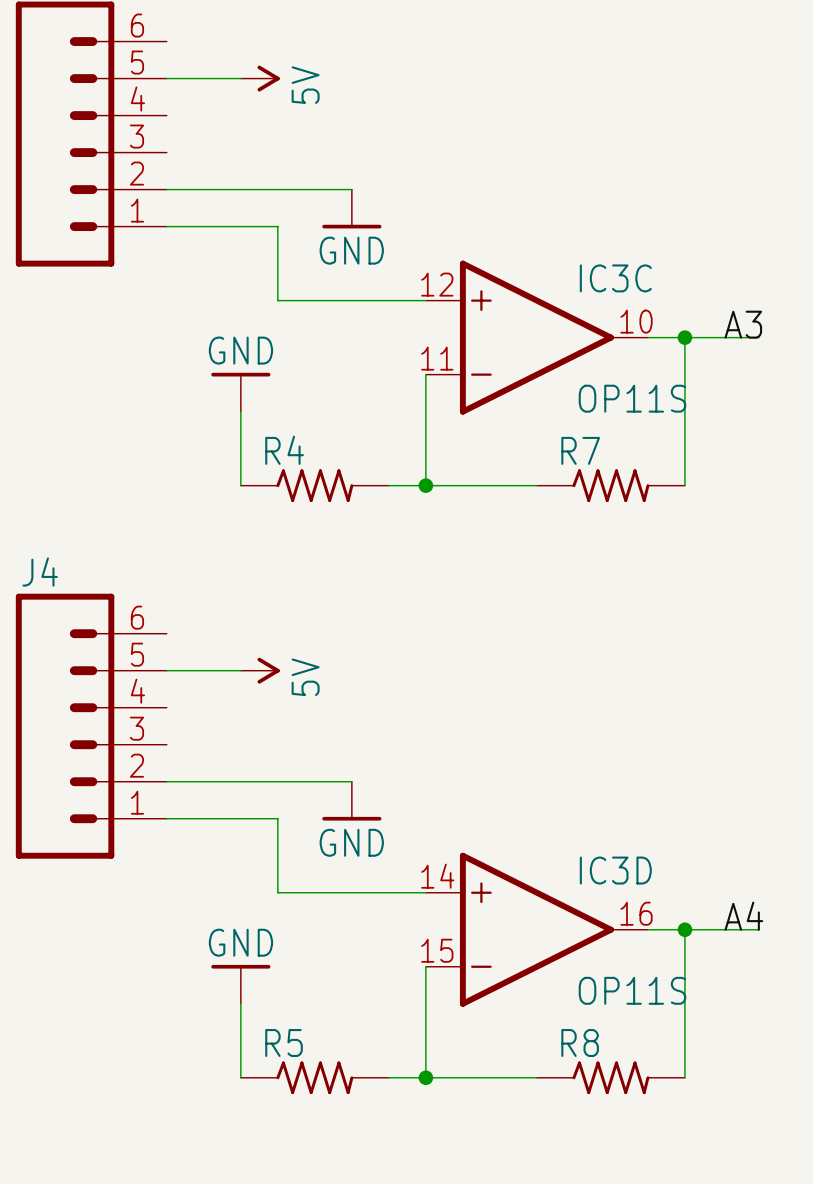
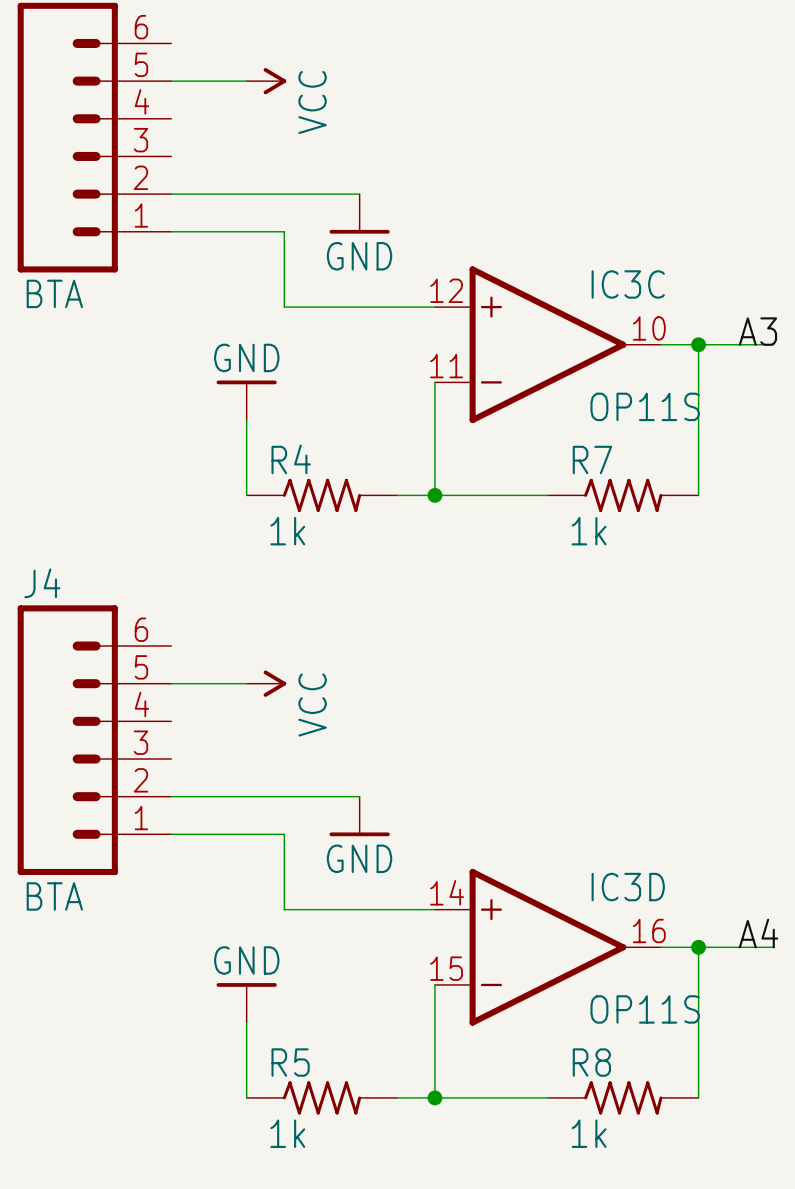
power symbol: 5V (260, 78) -> VCC (266, 81)
part value: none -> BTA (54, 293)
R4 value: none -> 1k (287, 531)
R7 value: none -> 1k (589, 531)
power symbol: 5V (260, 670) -> VCC (266, 683)
J4 value: none -> BTA (54, 896)
R5 value: none -> 1k (287, 1133)
R8 value: none -> 1k (589, 1133)

